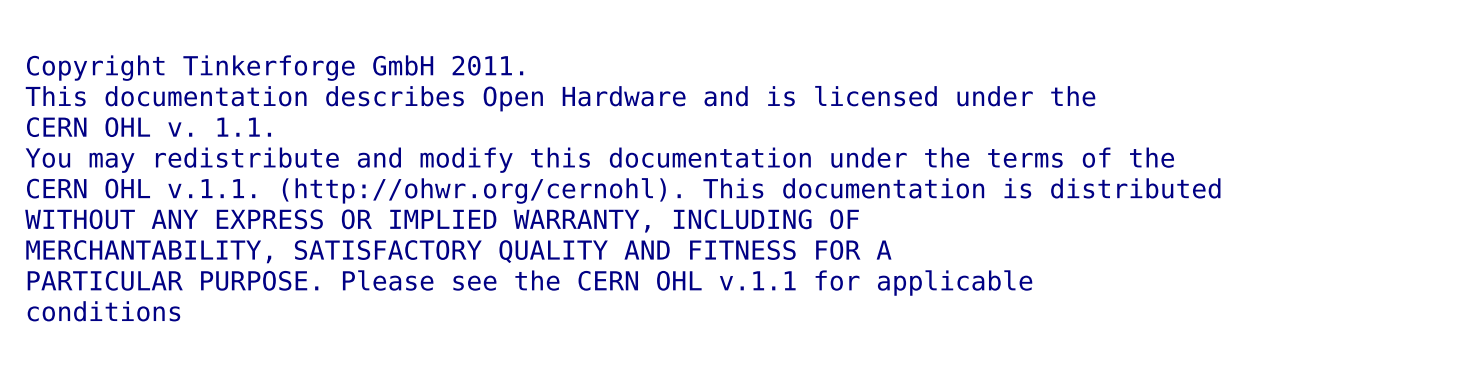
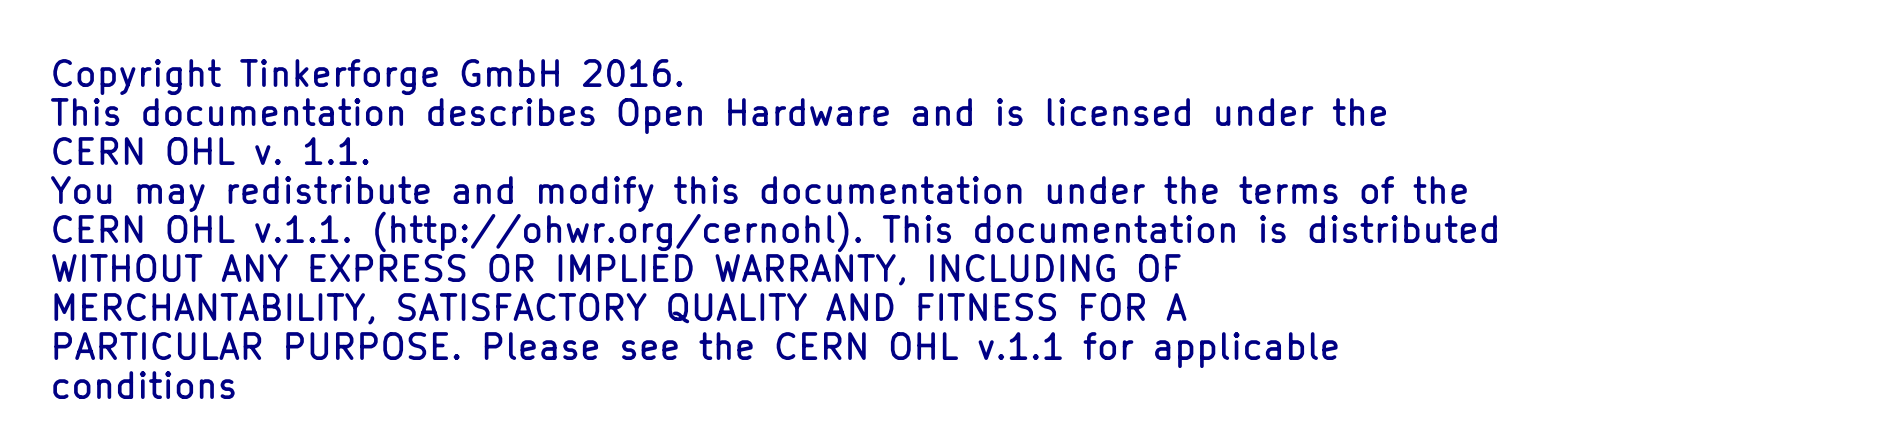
text: Copyright Tinkerforge GmbH 2011. (275, 68) -> Copyright Tinkerforge GmbH 2016. (367, 77)

